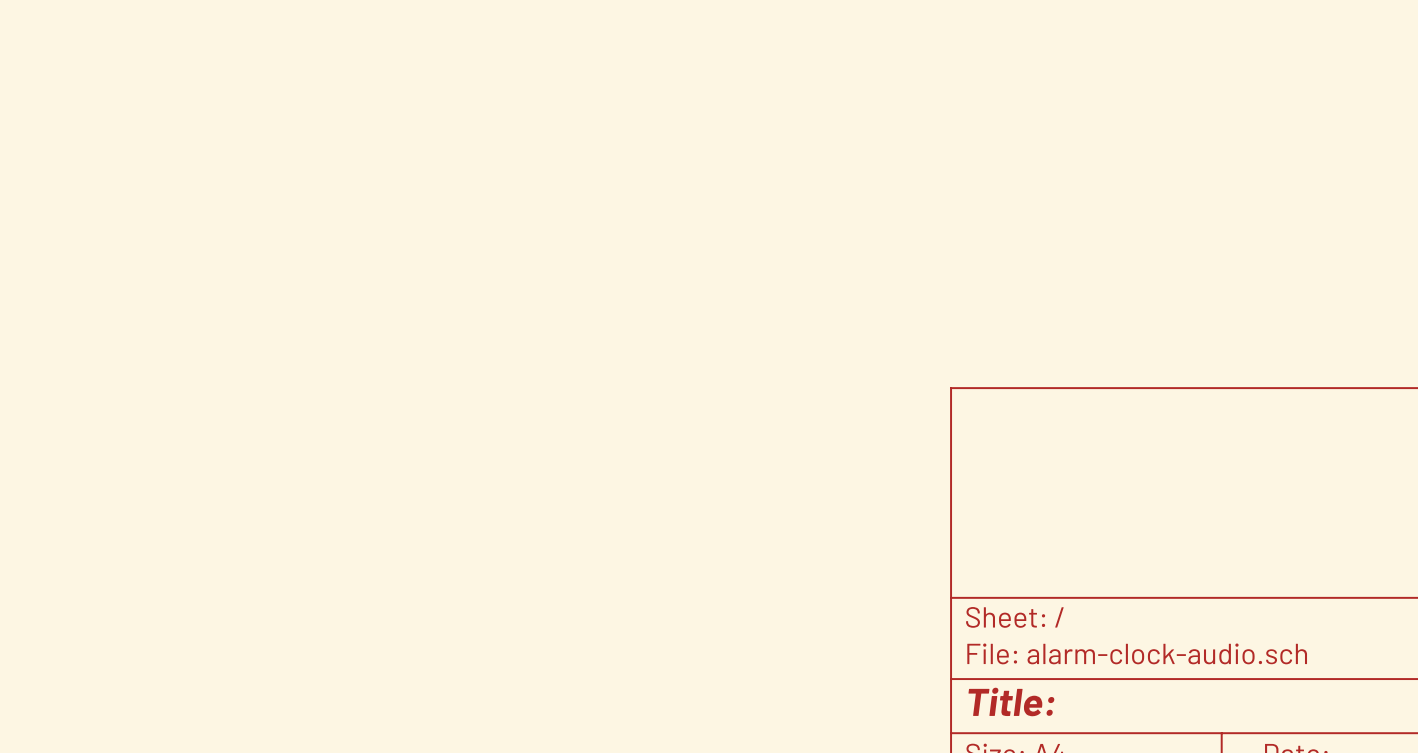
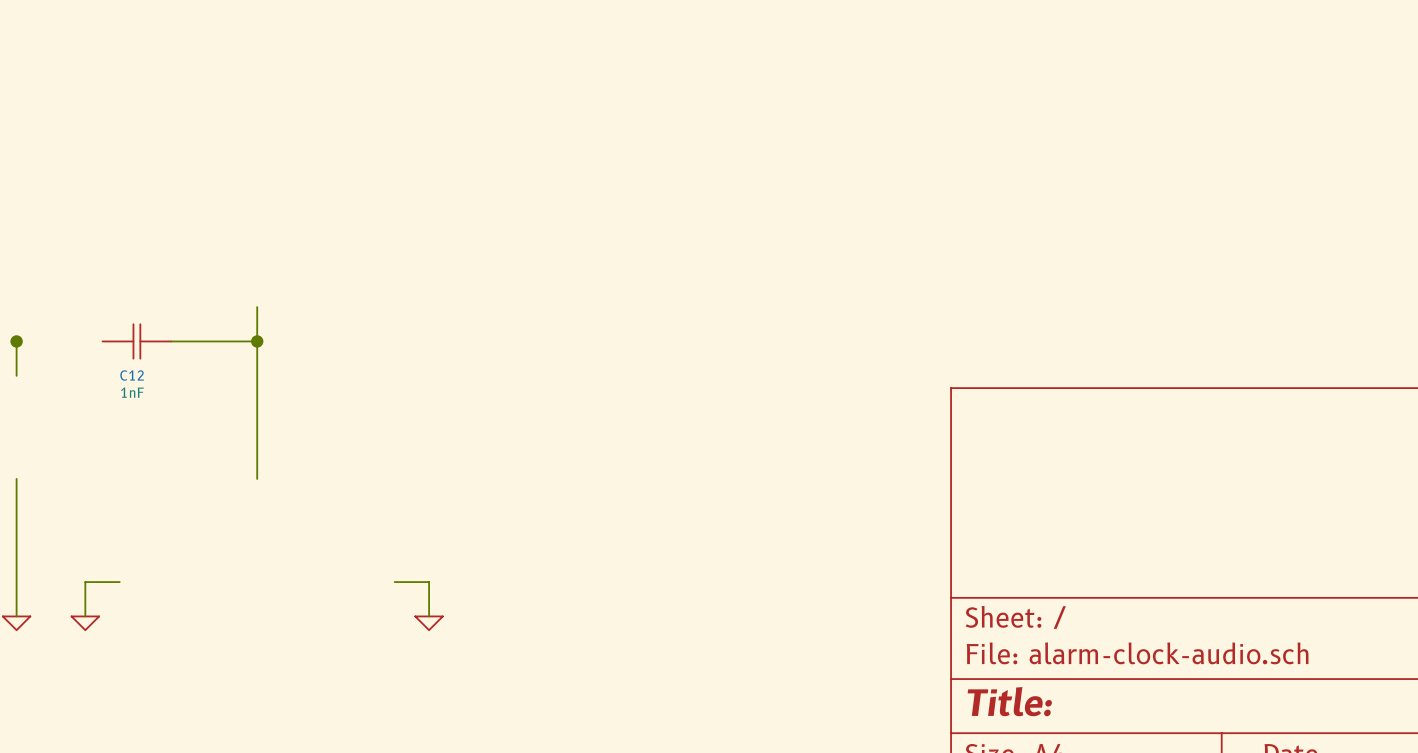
wire: none -> (257, 307) (257, 478)
wire: none -> (16, 341) (16, 375)
junction: none -> (16, 341)
C12: none -> 1nF (136, 341)
wire: none -> (171, 341) (257, 341)
junction: none -> (257, 341)
wire: none -> (16, 478) (16, 616)
wire: none -> (119, 582) (85, 582) (85, 616)
wire: none -> (394, 582) (429, 582) (429, 616)
power symbol: none -> (16, 623)
power symbol: none -> (85, 623)
power symbol: none -> (429, 623)

